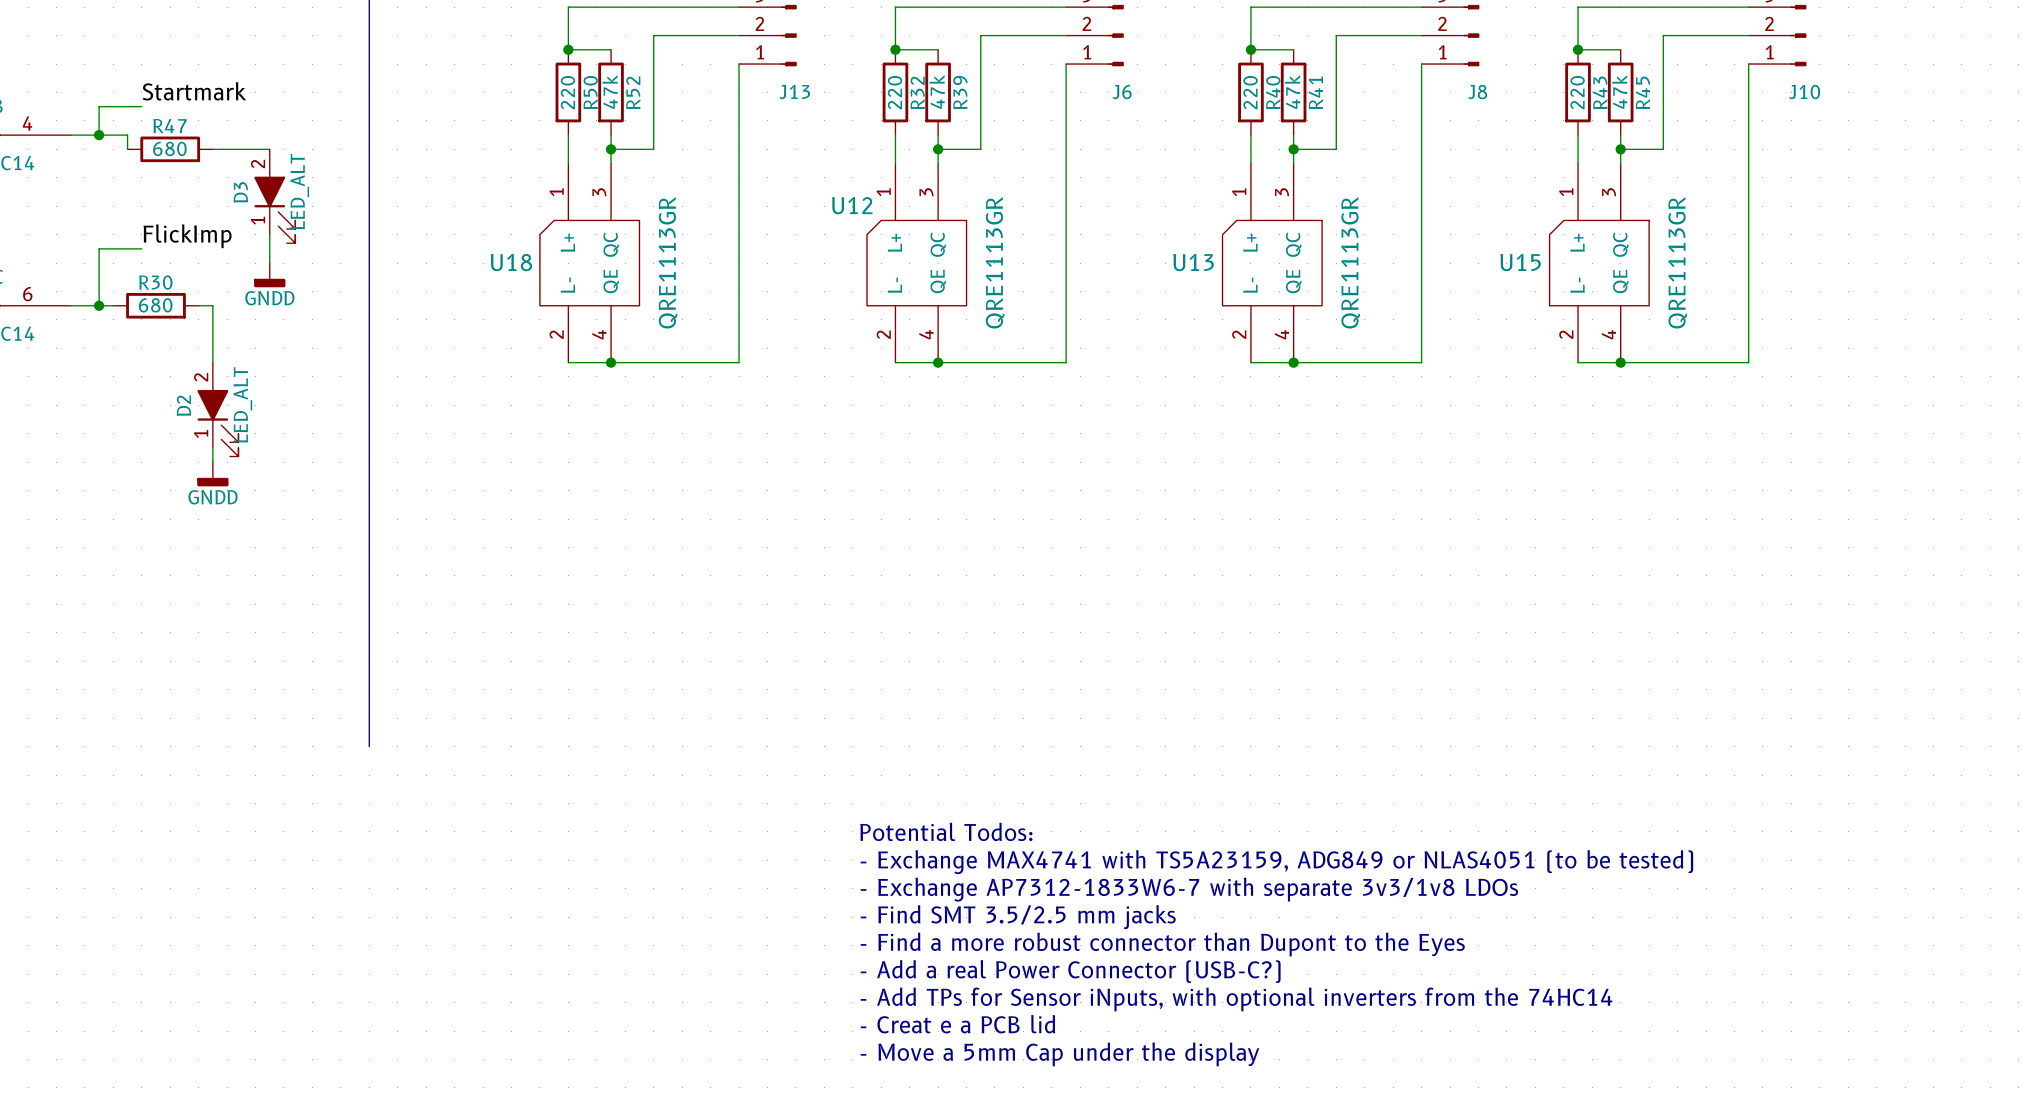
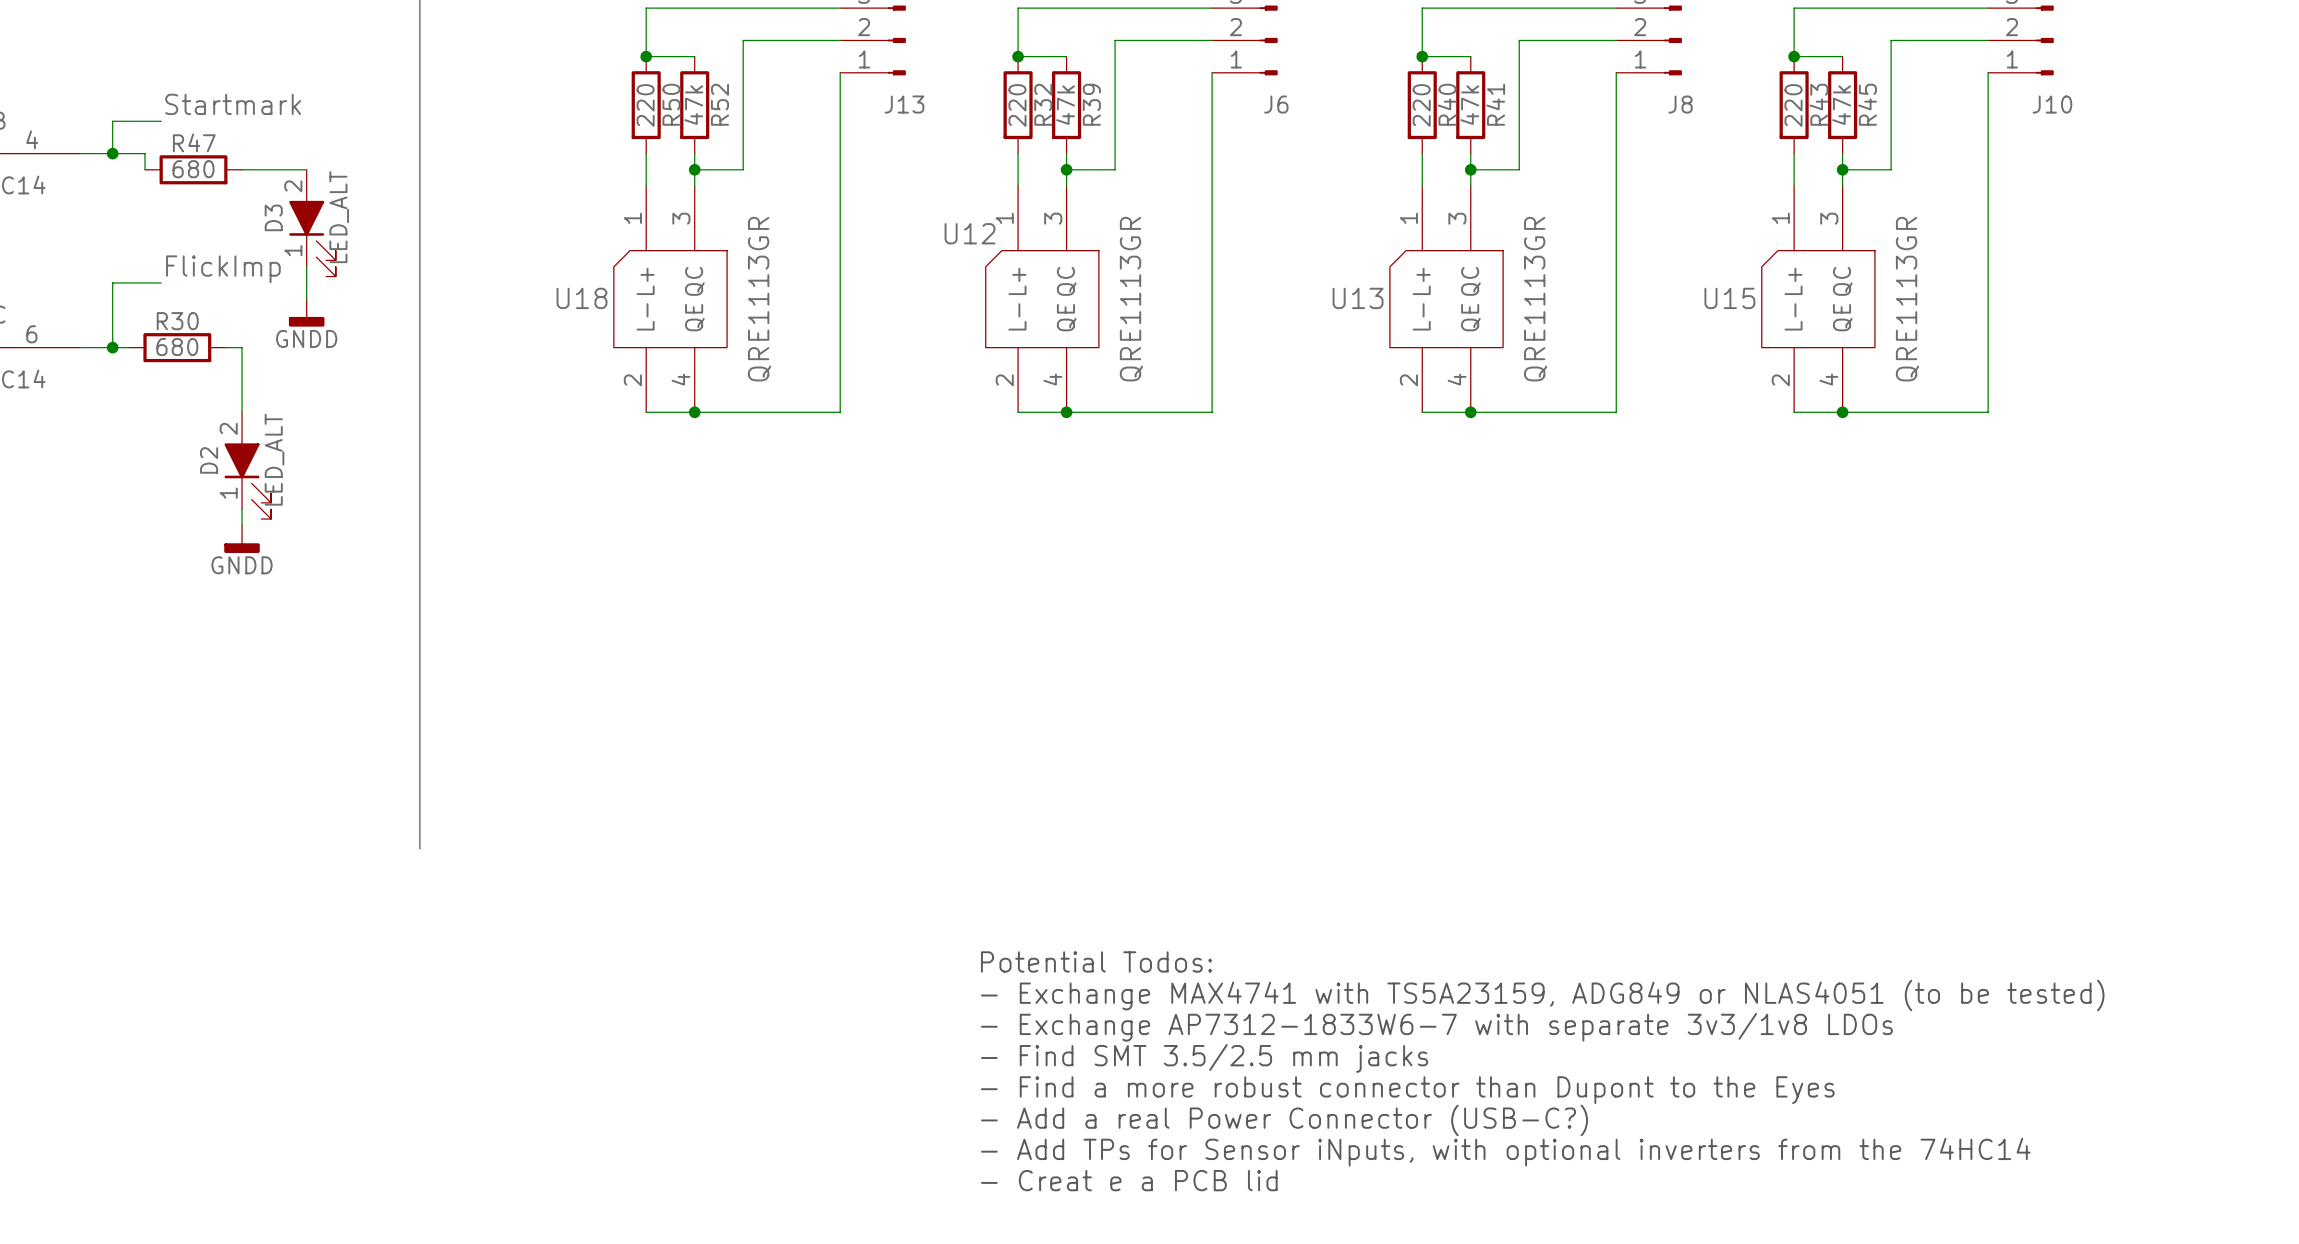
text position: Potential Todos: (946, 831) -> Potential Todos: (1096, 961)
text position: - Exchange MAX4741 with TS5A23159, ADG849 or NLAS4051 (to be tested) (1276, 862) -> - Exchange MAX4741 with TS5A23159, ADG849 or NLAS4051 (to be tested) (1542, 995)
text position: - Exchange AP7312-1833W6-7 with separate 3v3/1v8 LDOs (1189, 889) -> - Exchange AP7312-1833W6-7 with separate 3v3/1v8 LDOs (1436, 1027)
text position: - Find SMT 3.5/2.5 mm jacks (1018, 917) -> - Find SMT 3.5/2.5 mm jacks (1204, 1058)
text position: - Find a more robust connector than Dupont to the Eyes (1162, 944) -> - Find a more robust connector than Dupont to the Eyes (1407, 1090)
text position: - Add a real Power Connector (USB-C?) (1070, 971) -> - Add a real Power Connector (USB-C?) (1284, 1120)
text position: - Add TPs for Sensor iNputs, with optional inverters from the 74HC14 (1236, 999) -> - Add TPs for Sensor iNputs, with optional inverters from the 74HC14 (1505, 1152)
text position: - Creat e a PCB lid (957, 1024) -> - Creat e a PCB lid (1129, 1180)
text: - Move a 5mm Cap under the display (1060, 1054) -> none

